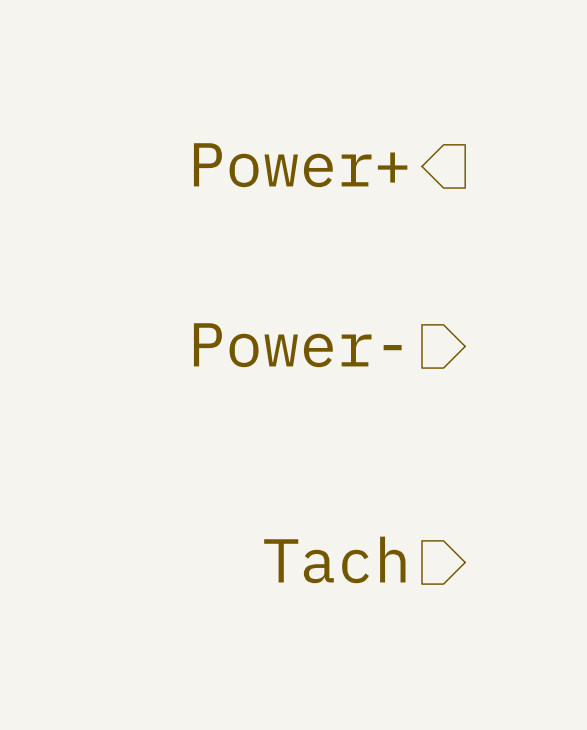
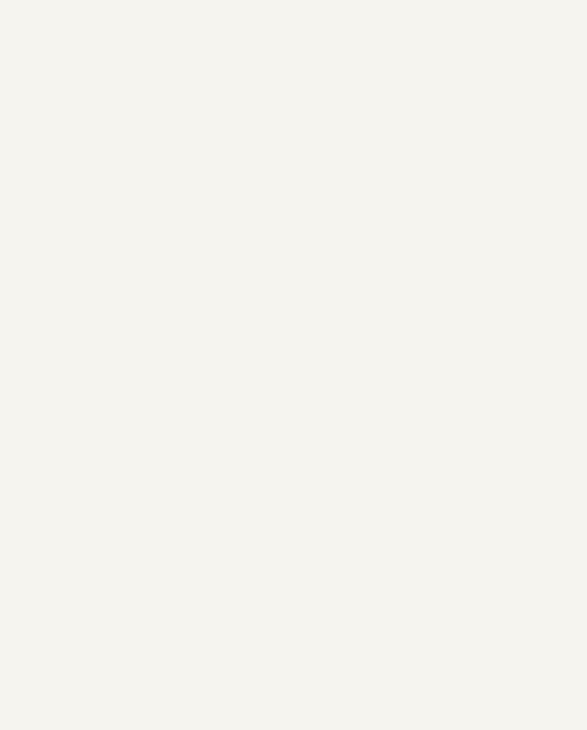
hierarchical label: Power+ (300, 165) -> none
hierarchical label: Power- (297, 345) -> none
hierarchical label: Tach (334, 559) -> none

